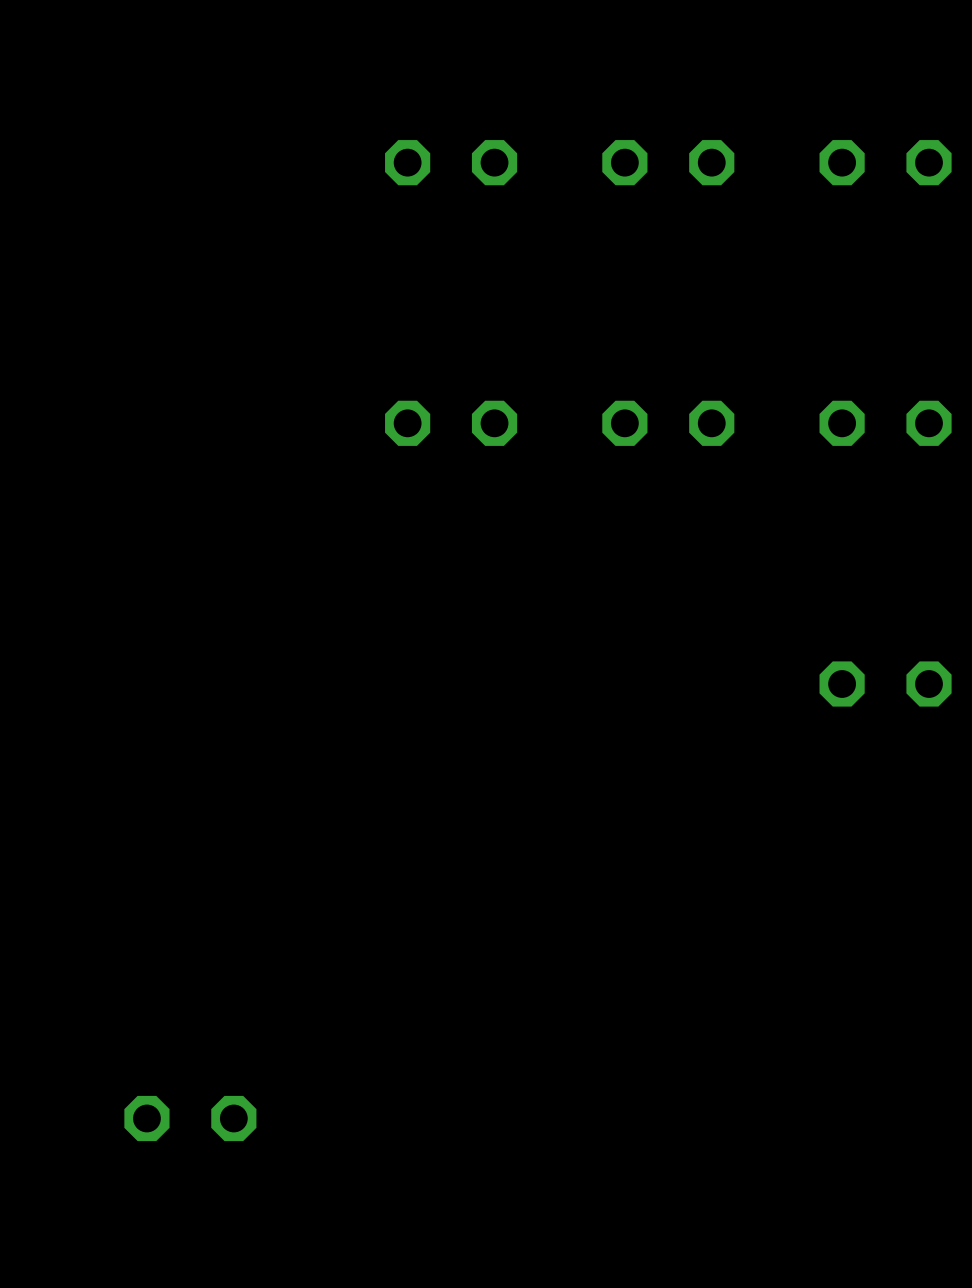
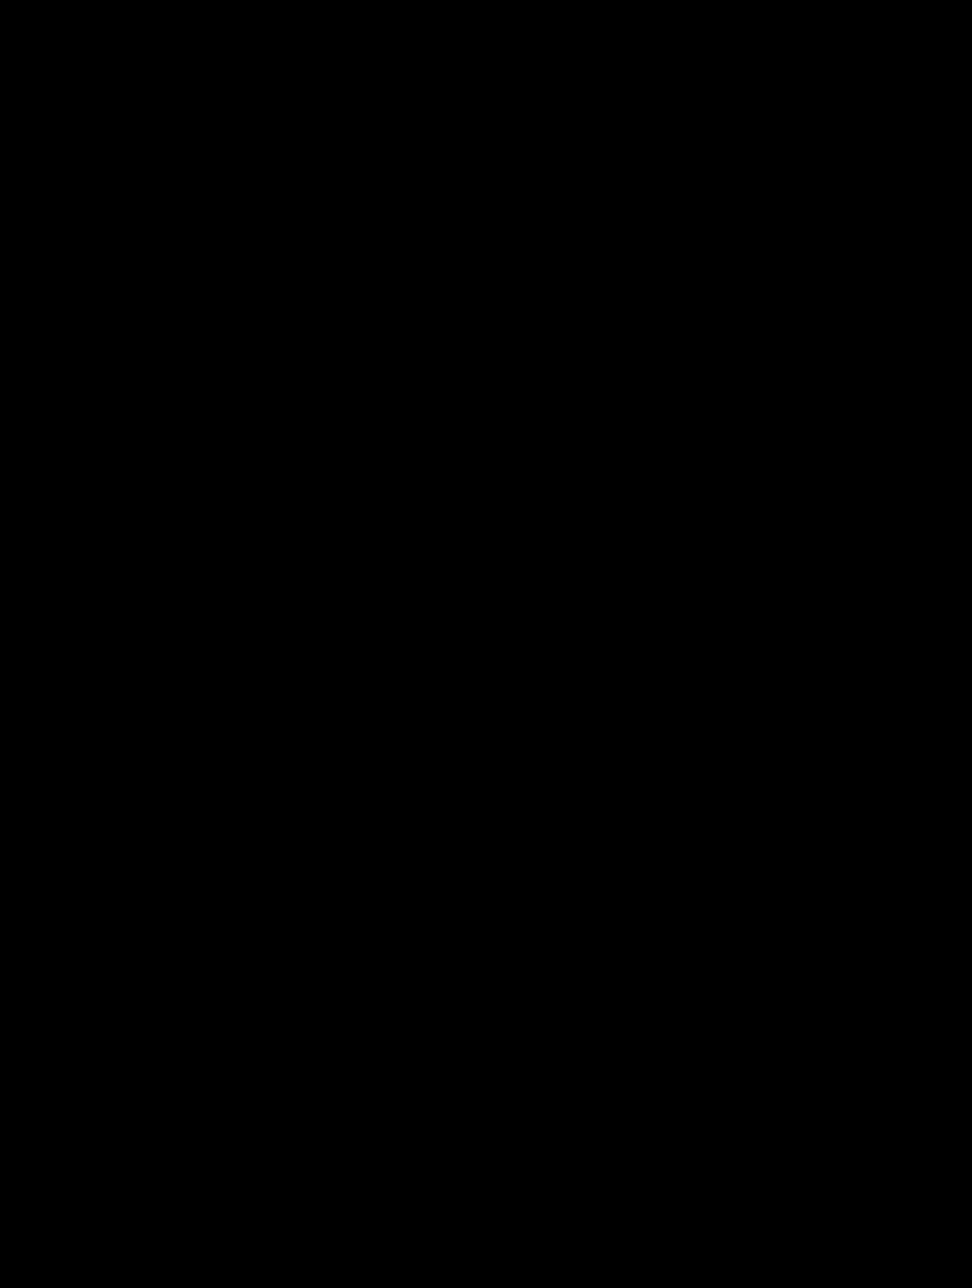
part: (451, 162) -> none
part: (668, 162) -> none
part: (885, 162) -> none
part: (451, 423) -> none
part: (668, 423) -> none
part: (885, 423) -> none
part: (885, 684) -> none
part: (190, 1118) -> none

